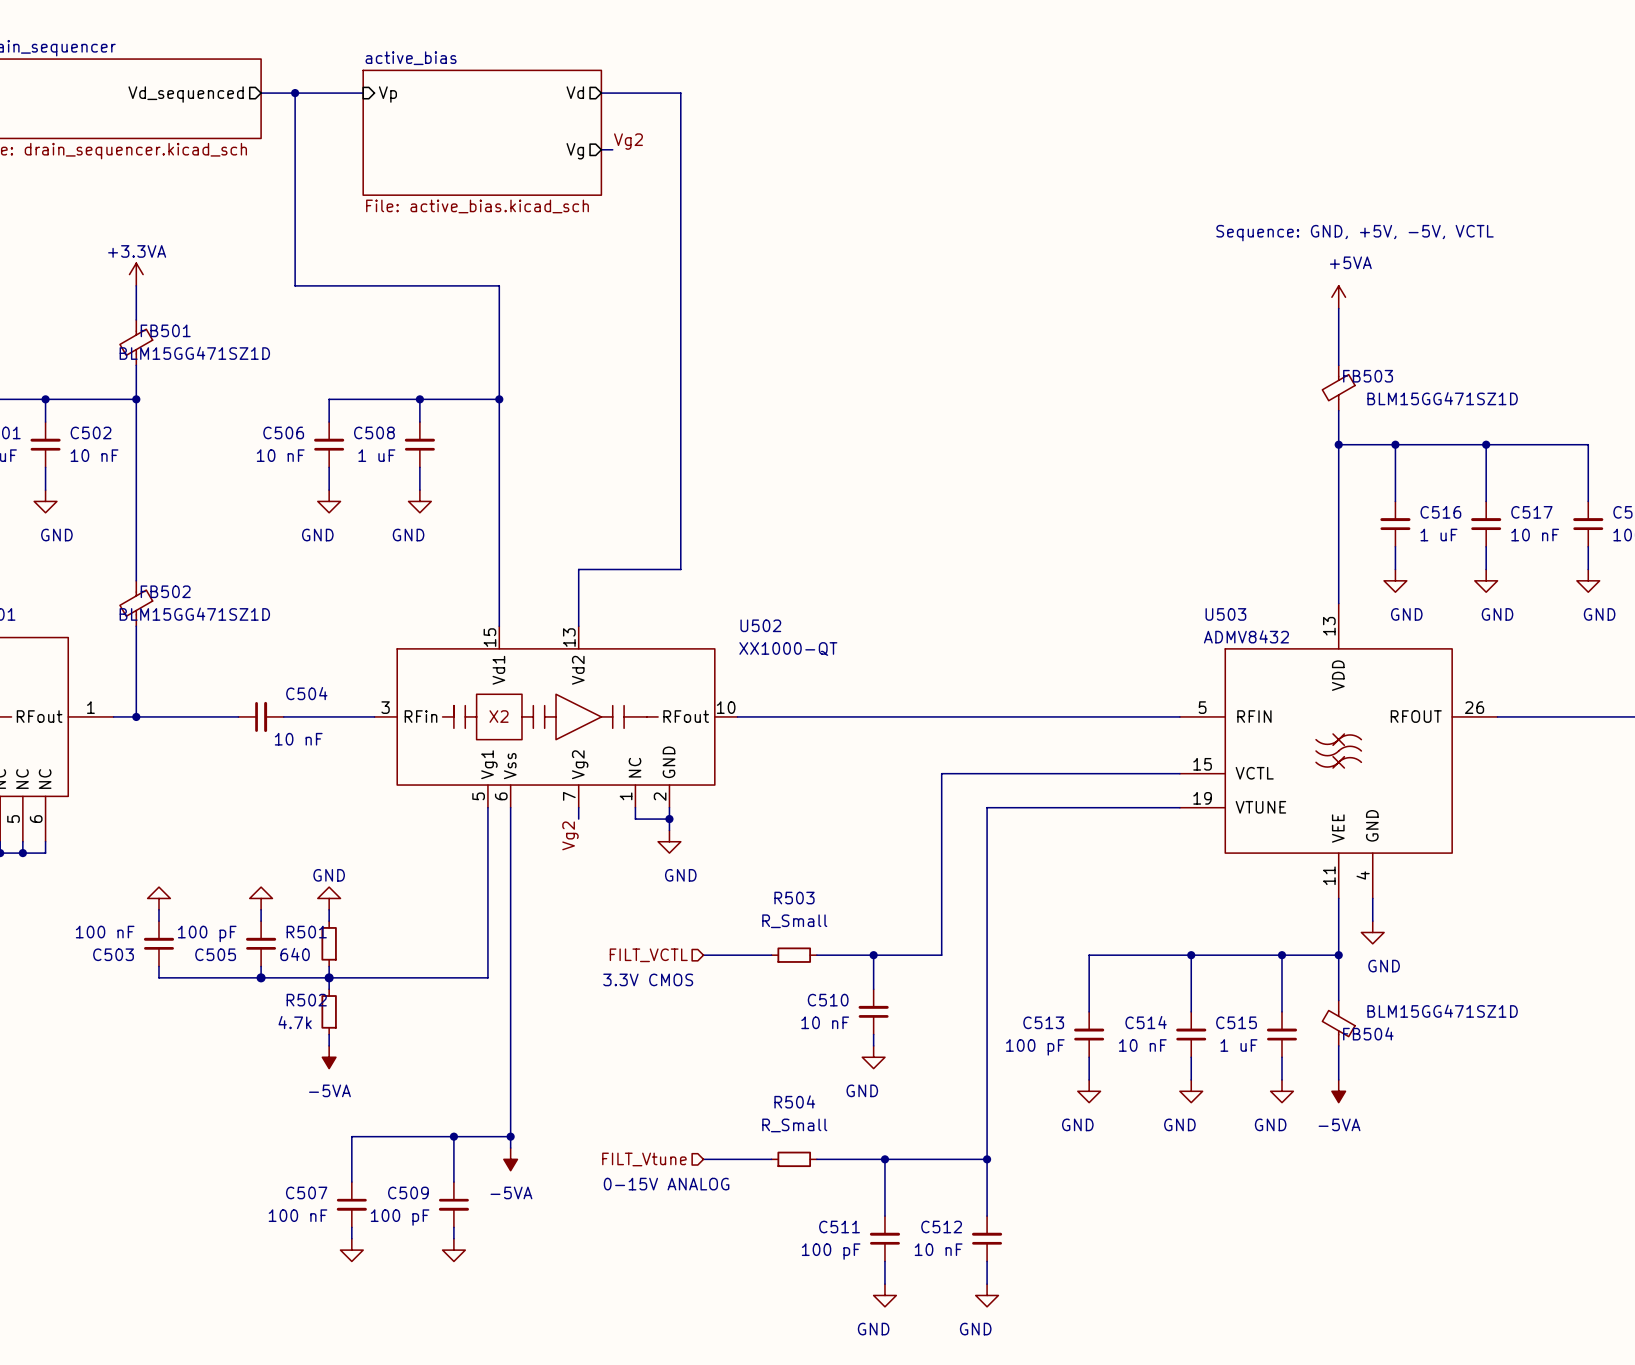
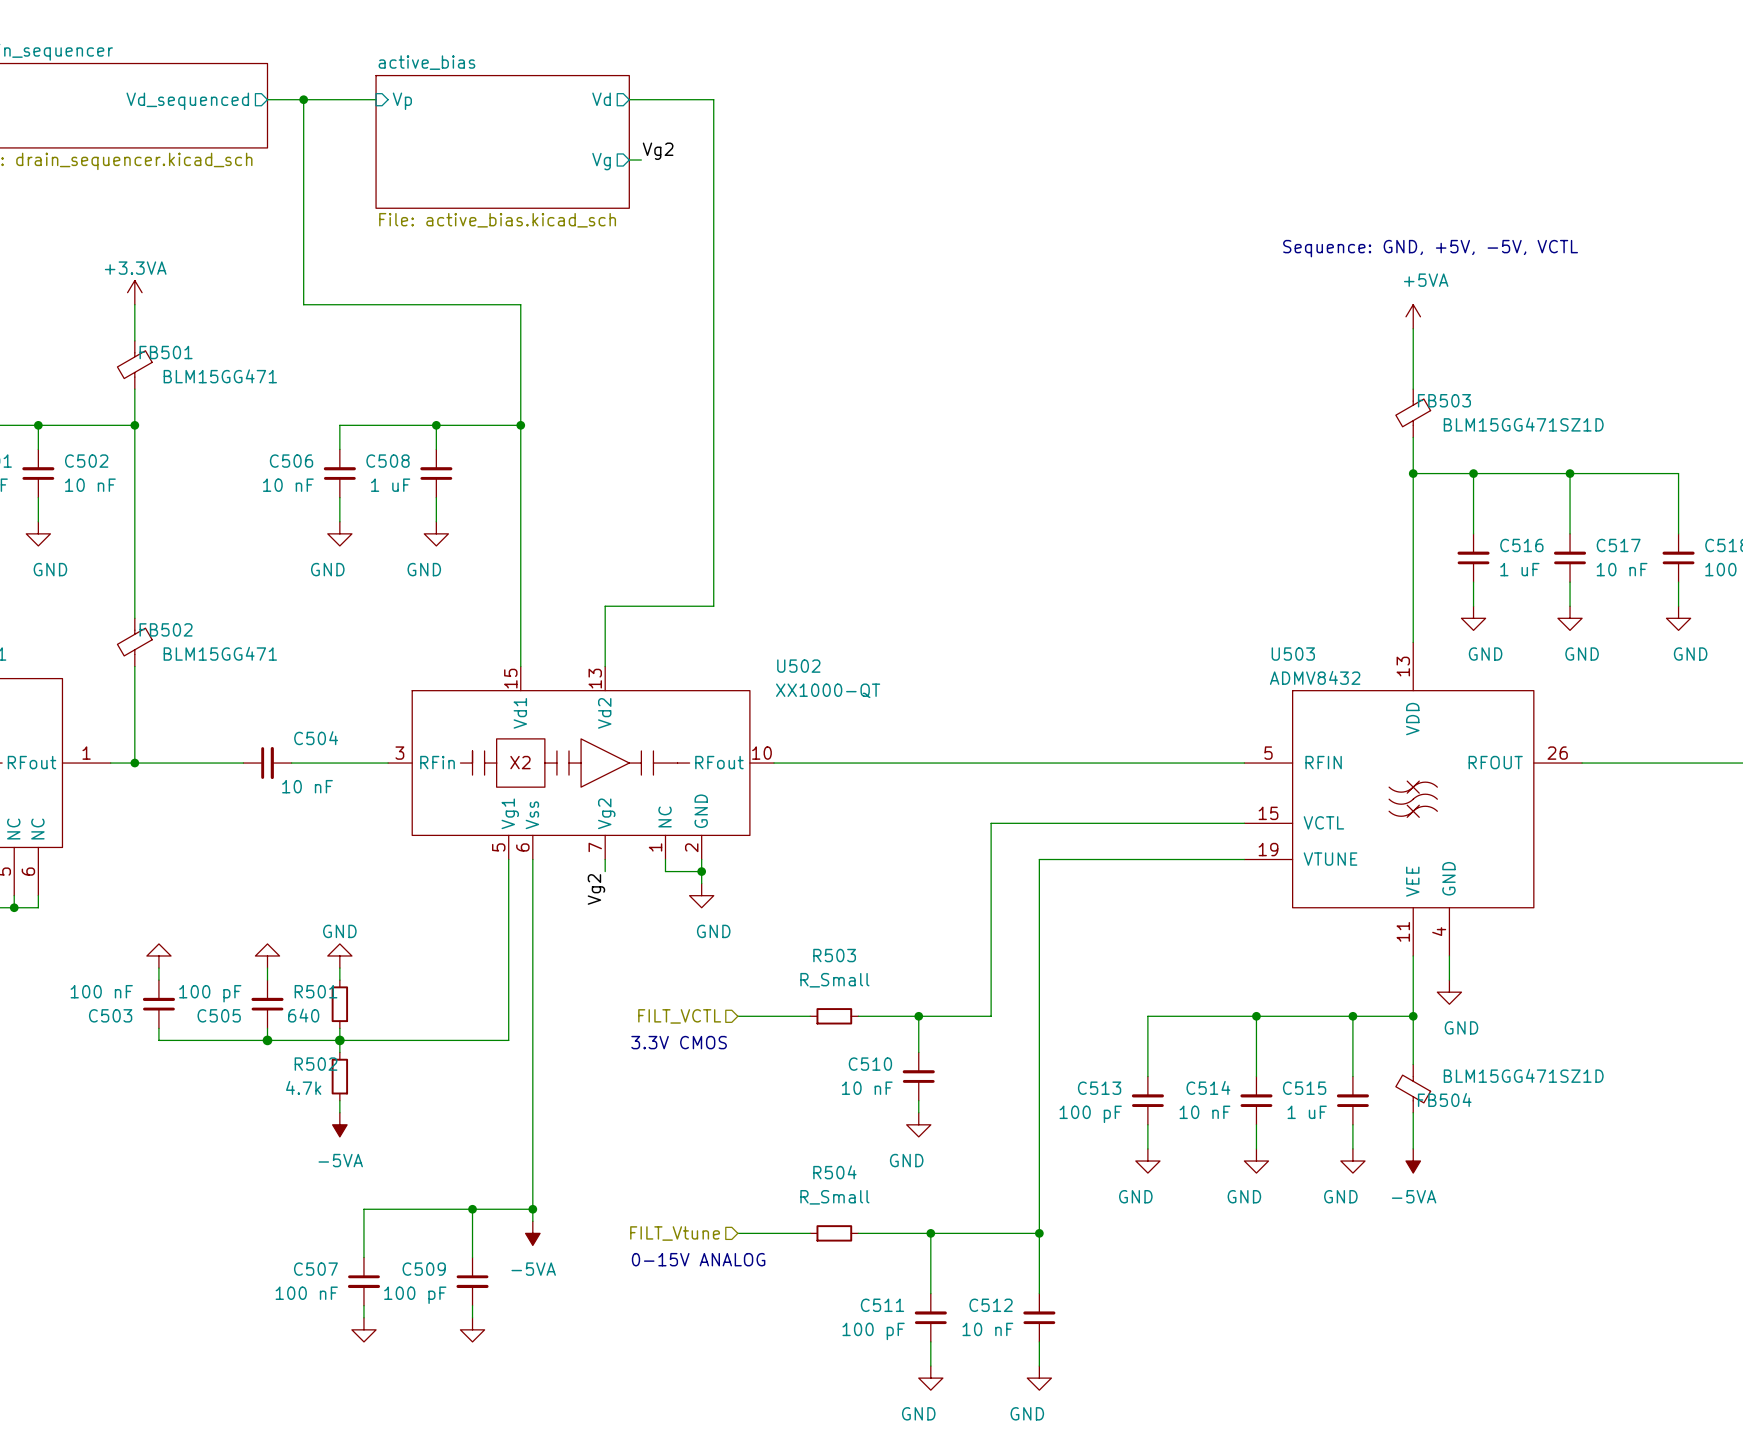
FB501 value: BLM15GG471SZ1D (194, 353) -> BLM15GG471 (220, 376)
FB502 value: BLM15GG471SZ1D (194, 614) -> BLM15GG471 (220, 653)

